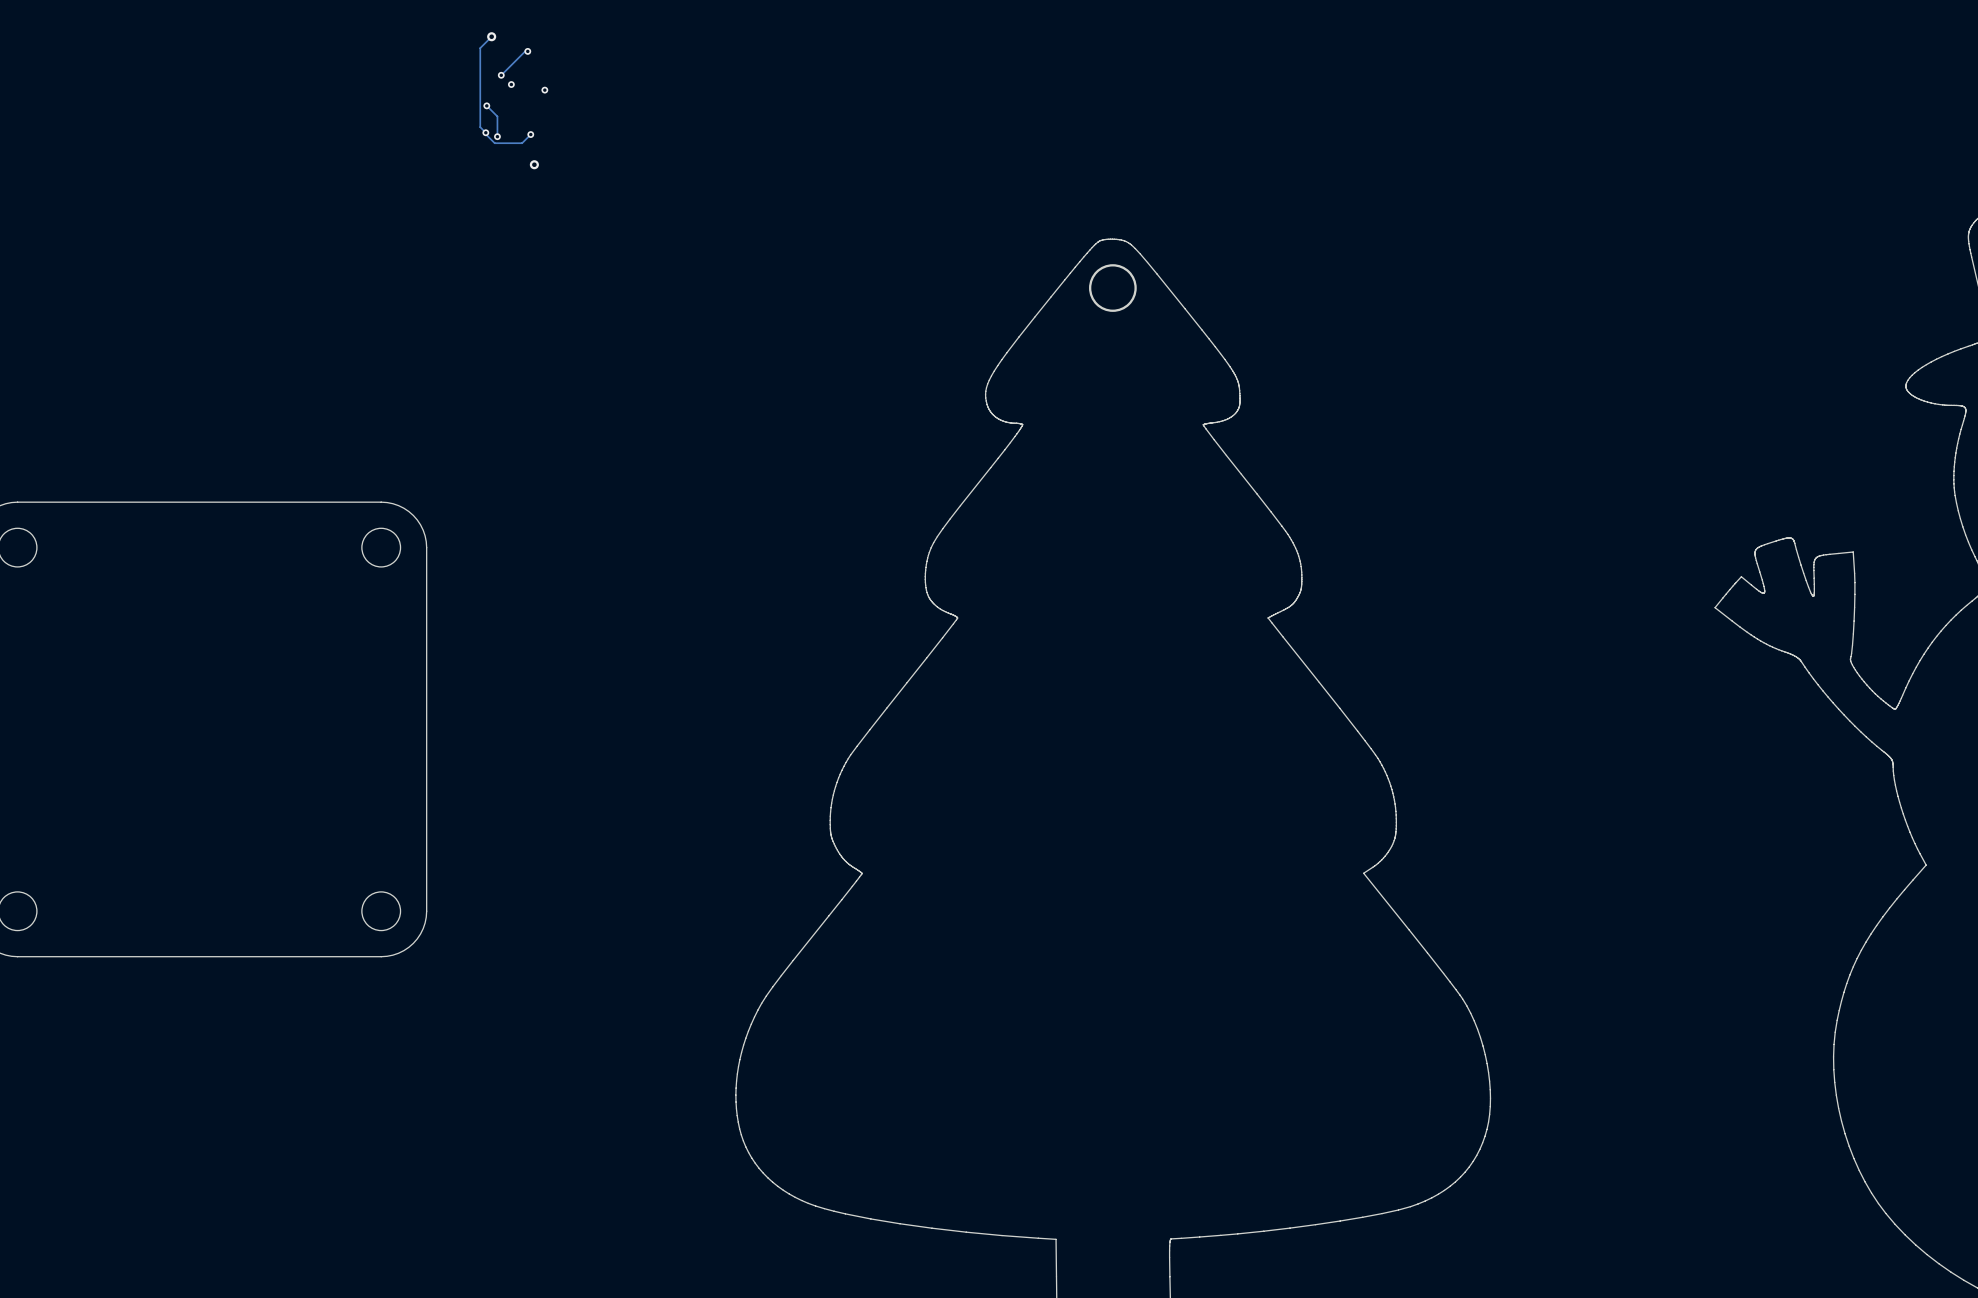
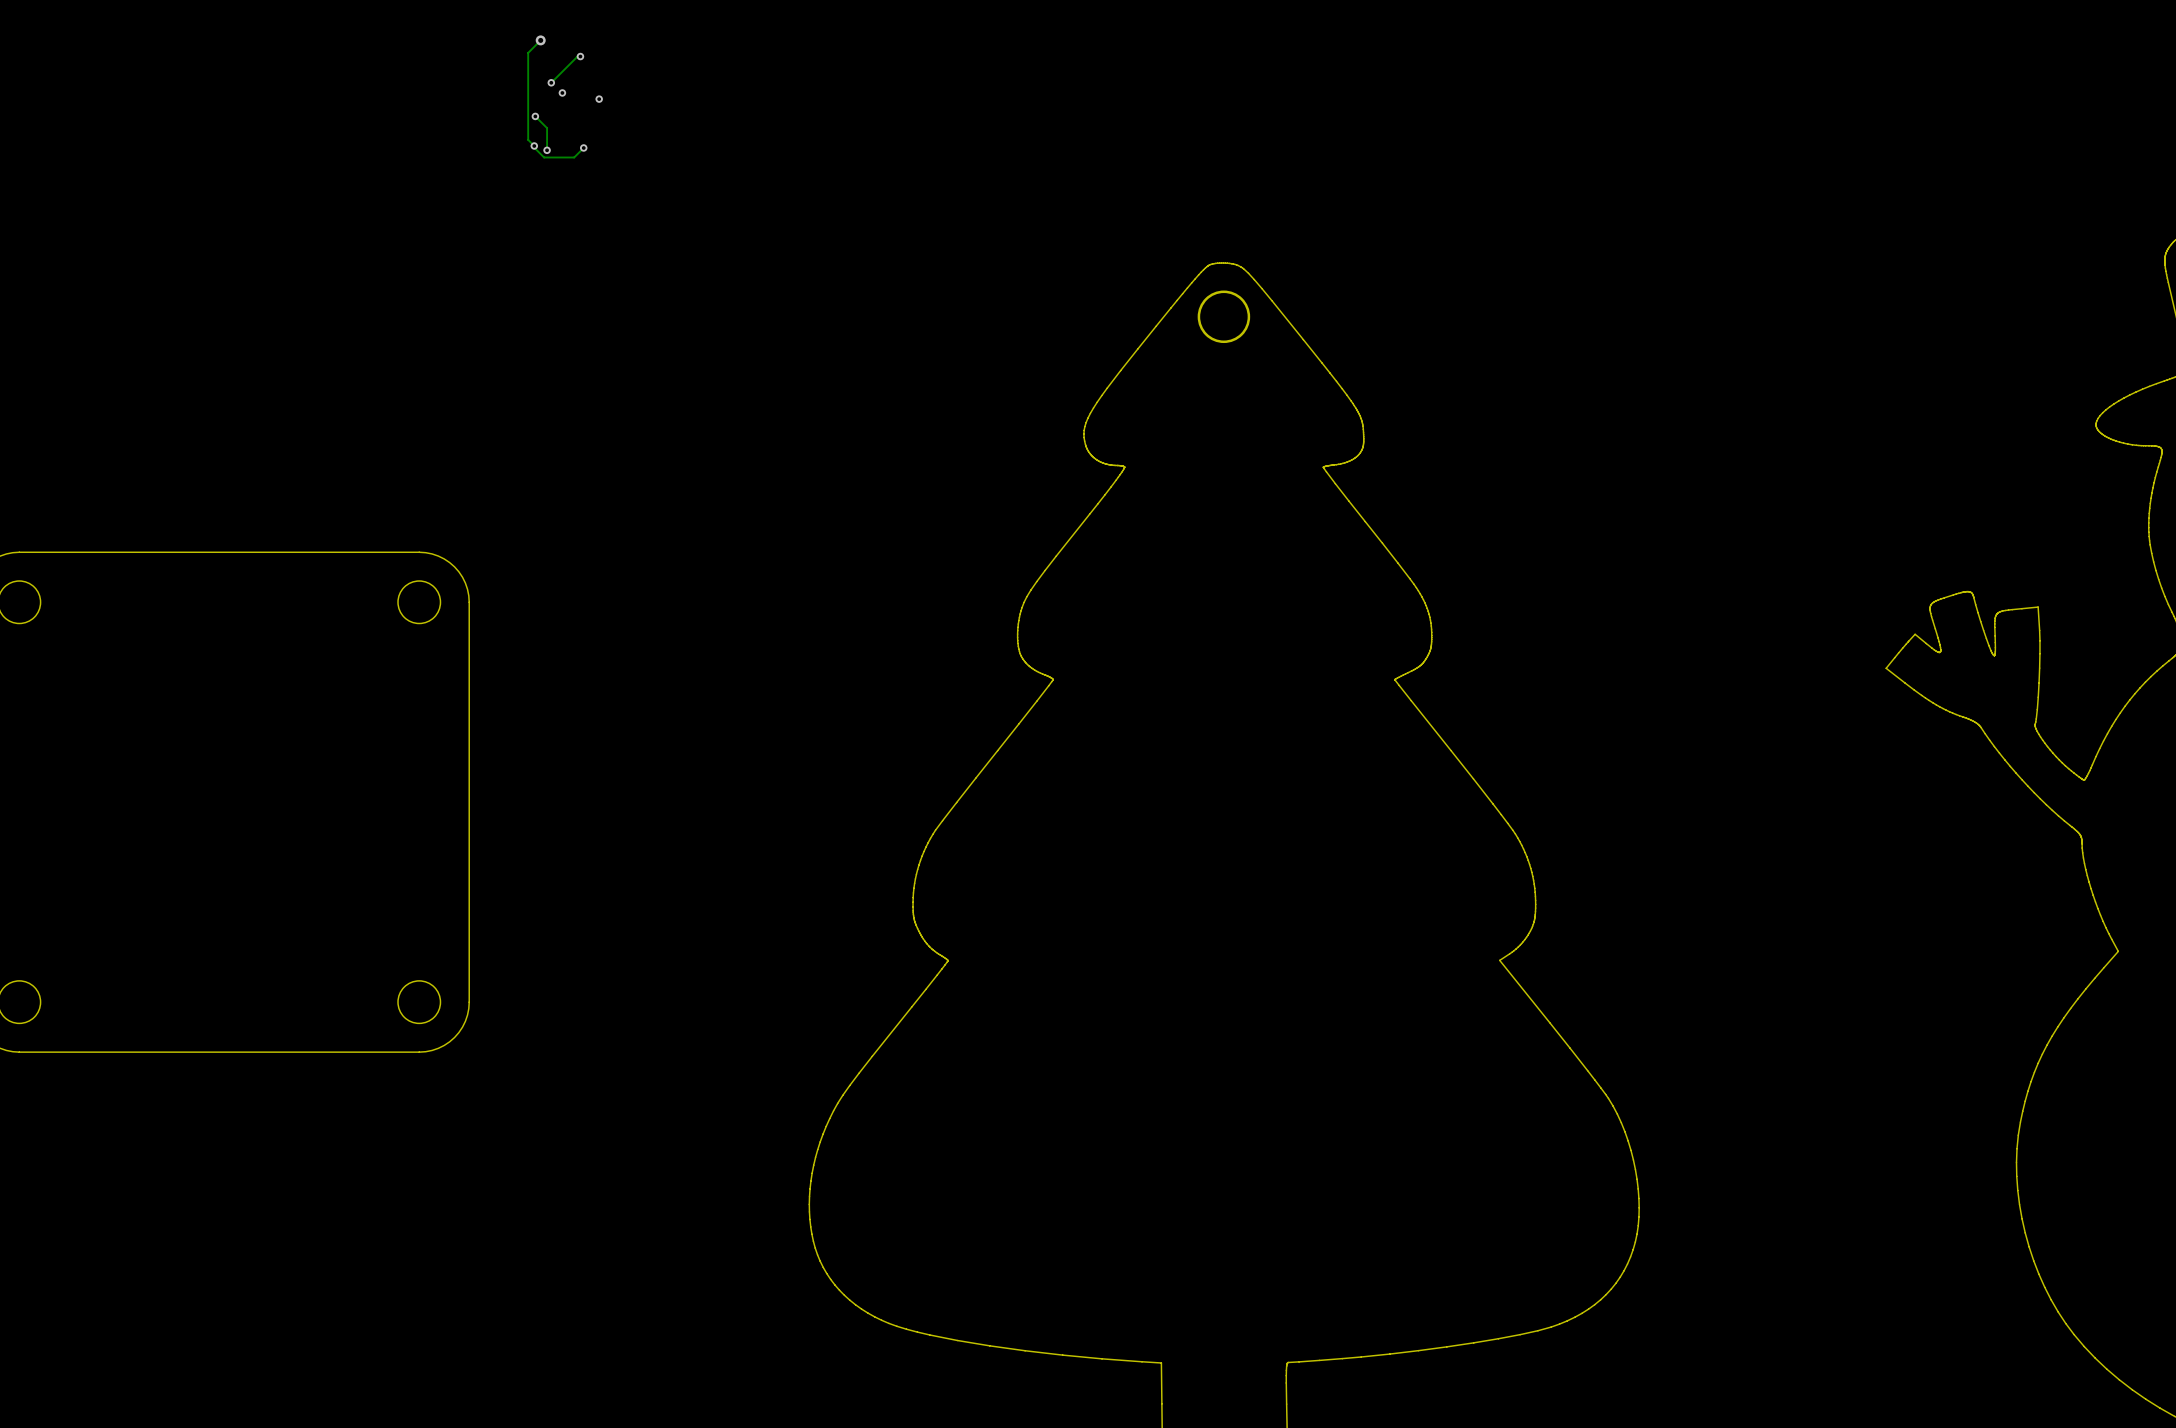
via: (534, 164) -> none

